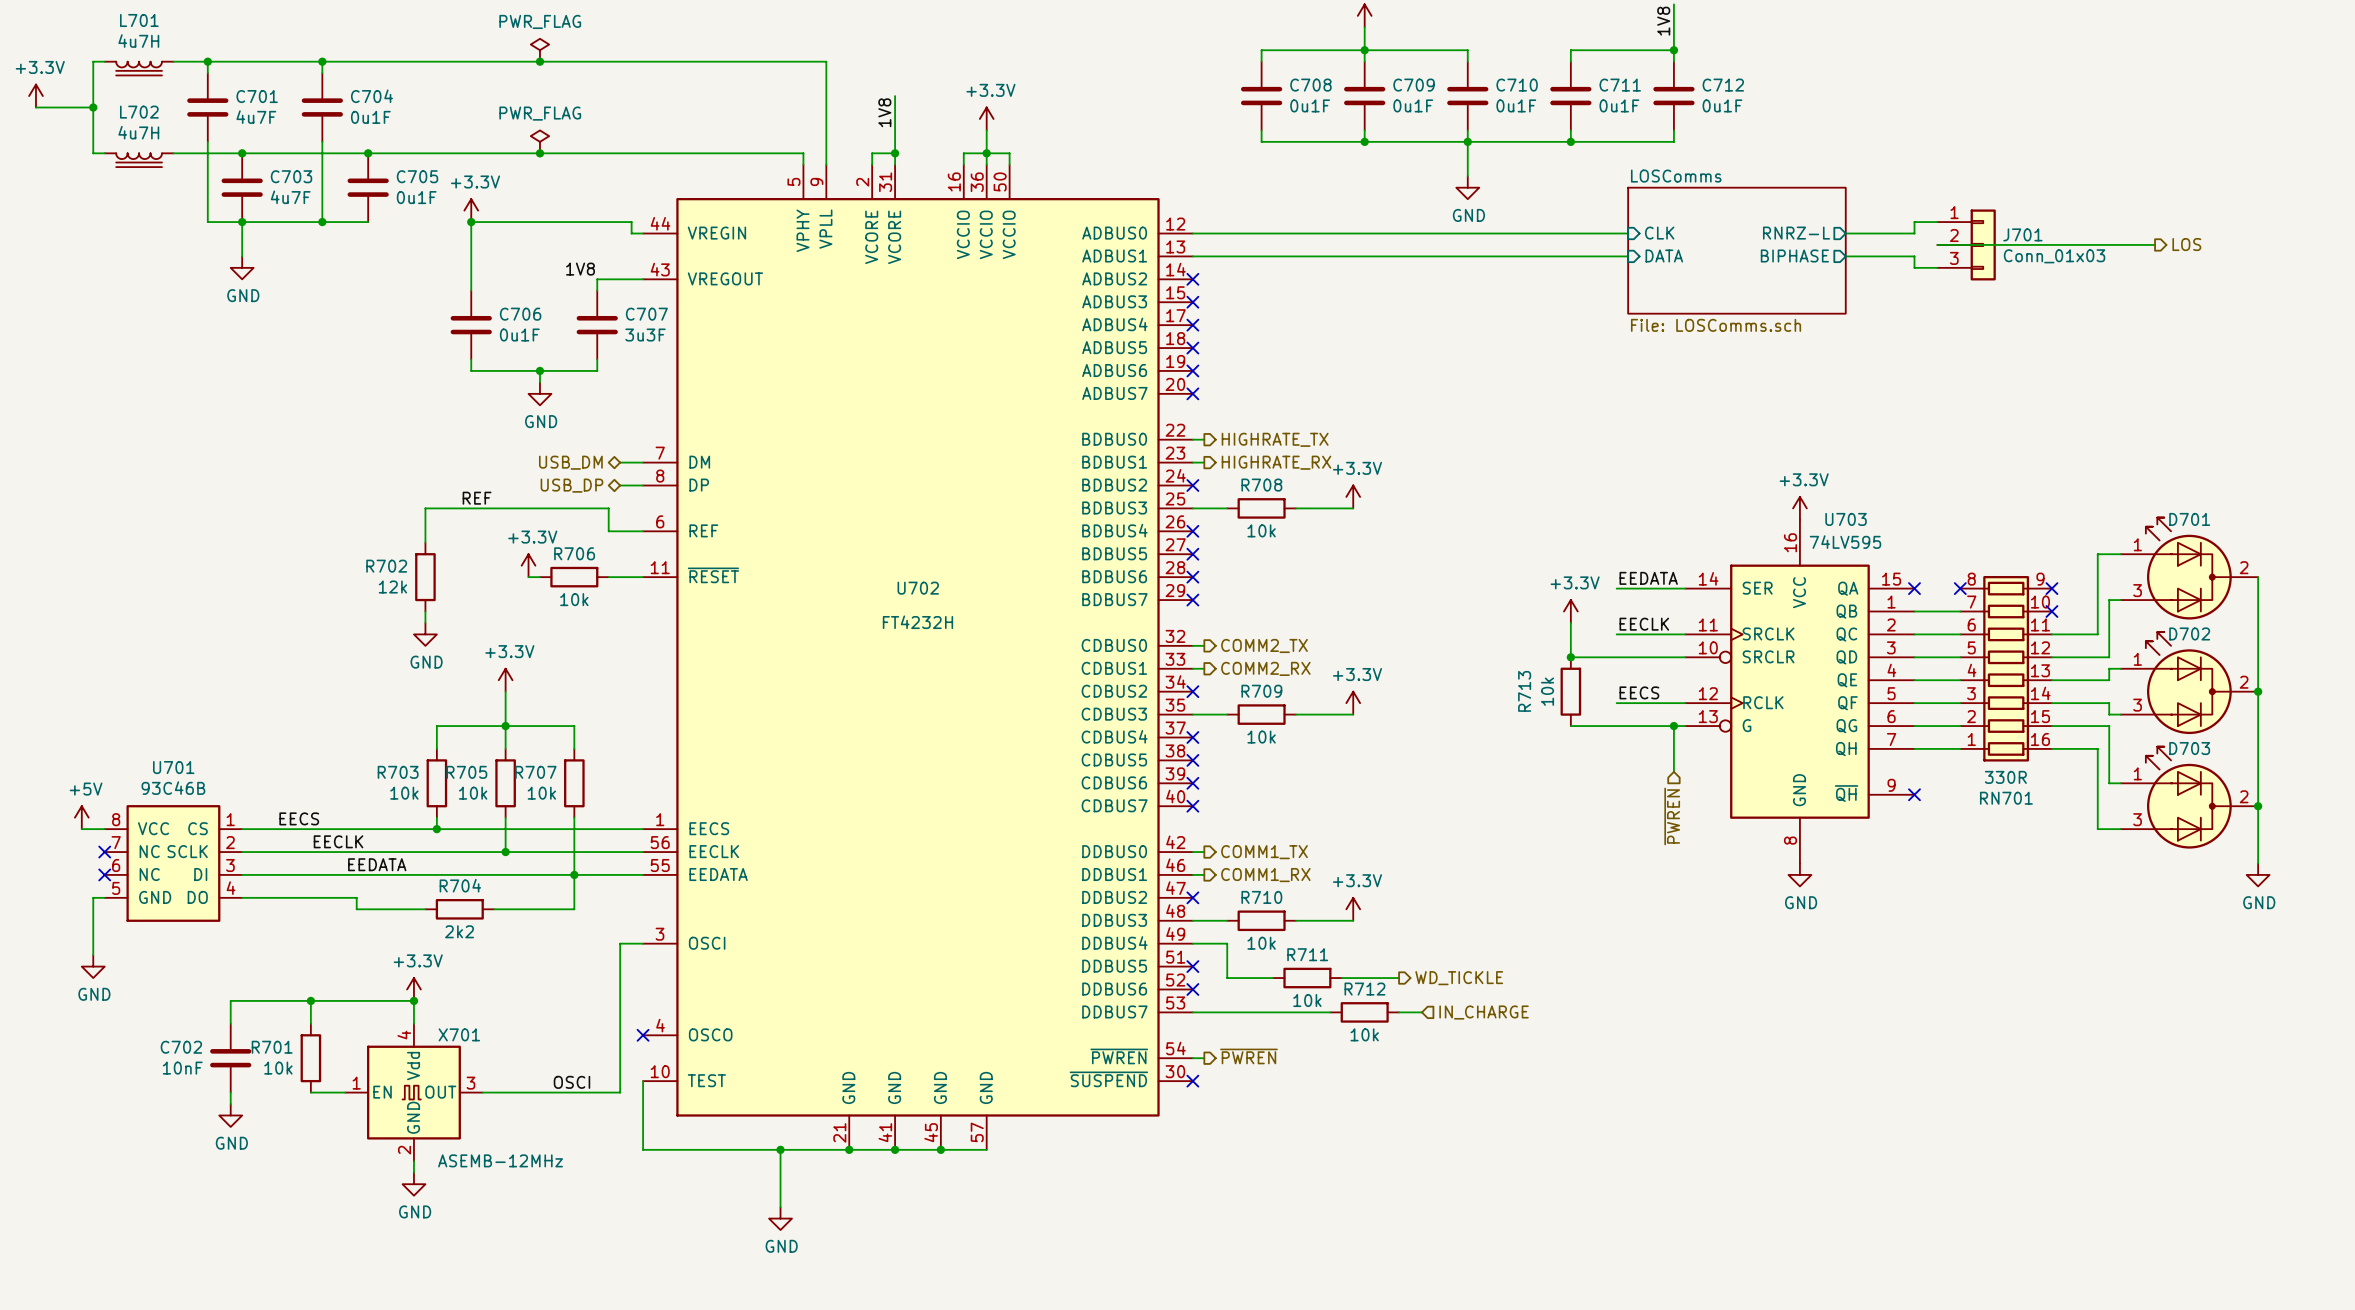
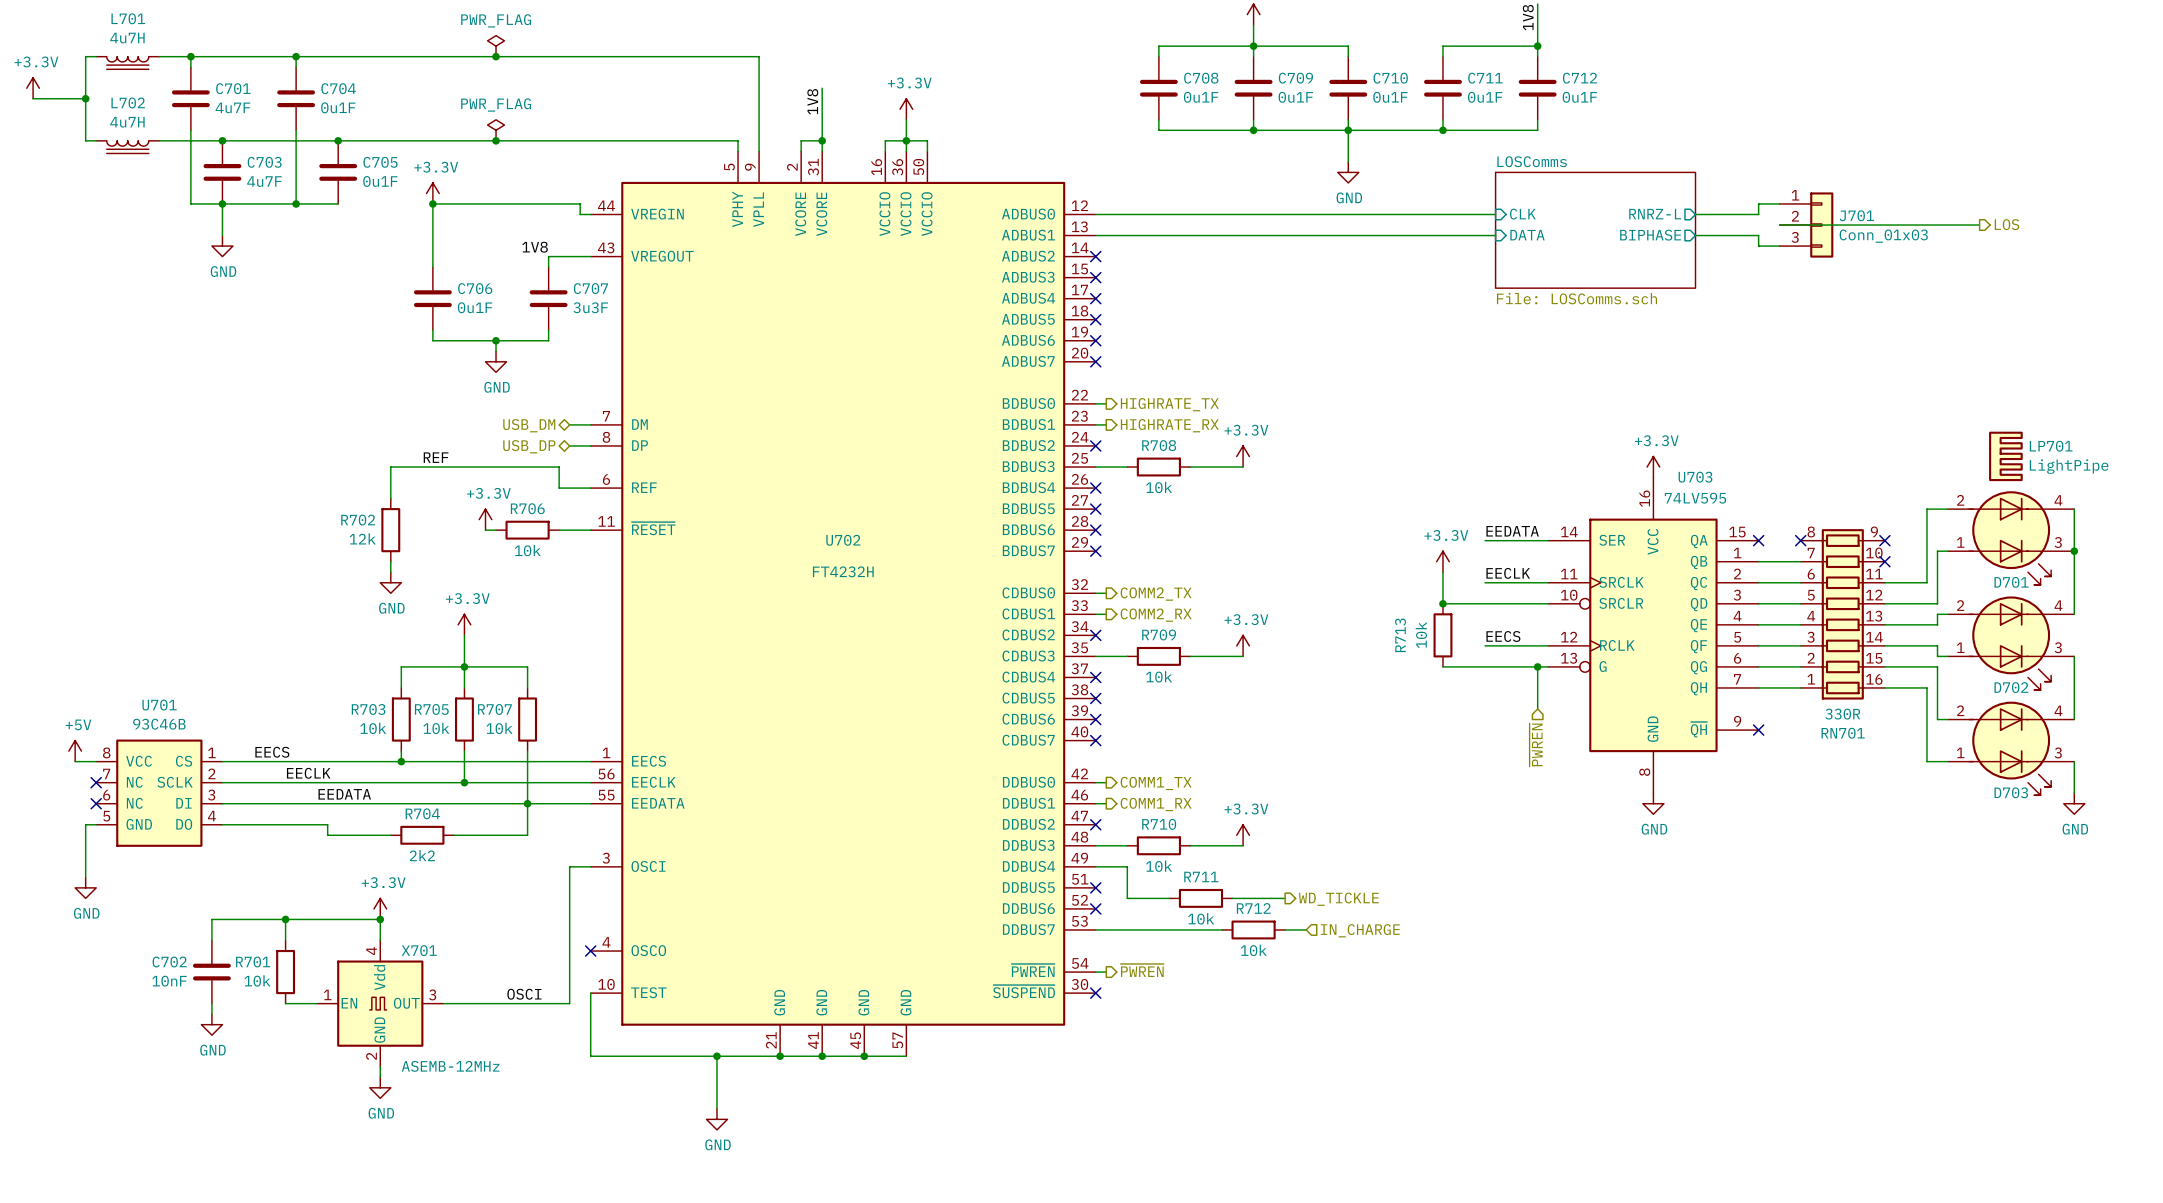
LP701: none -> LightPipe (2005, 456)
D701 symbol: [2120, 517, 2259, 620] -> [1948, 491, 2075, 585]
D701 name position: D701 (2189, 519) -> D701 (2011, 582)
wire: none -> (2074, 509) (2074, 530)
junction: none -> (2074, 551)
D702 symbol: [2120, 632, 2259, 735] -> [1948, 596, 2075, 691]
D702 name position: D702 (2189, 633) -> D702 (2011, 687)
wire: (2258, 668) (2258, 714) -> none
junction: (2258, 691) -> none
D703 symbol: [2120, 746, 2259, 849] -> [1948, 701, 2075, 796]
D703 name position: D703 (2189, 748) -> D703 (2011, 792)
wire: (2258, 783) (2258, 829) -> none
junction: (2258, 806) -> none

